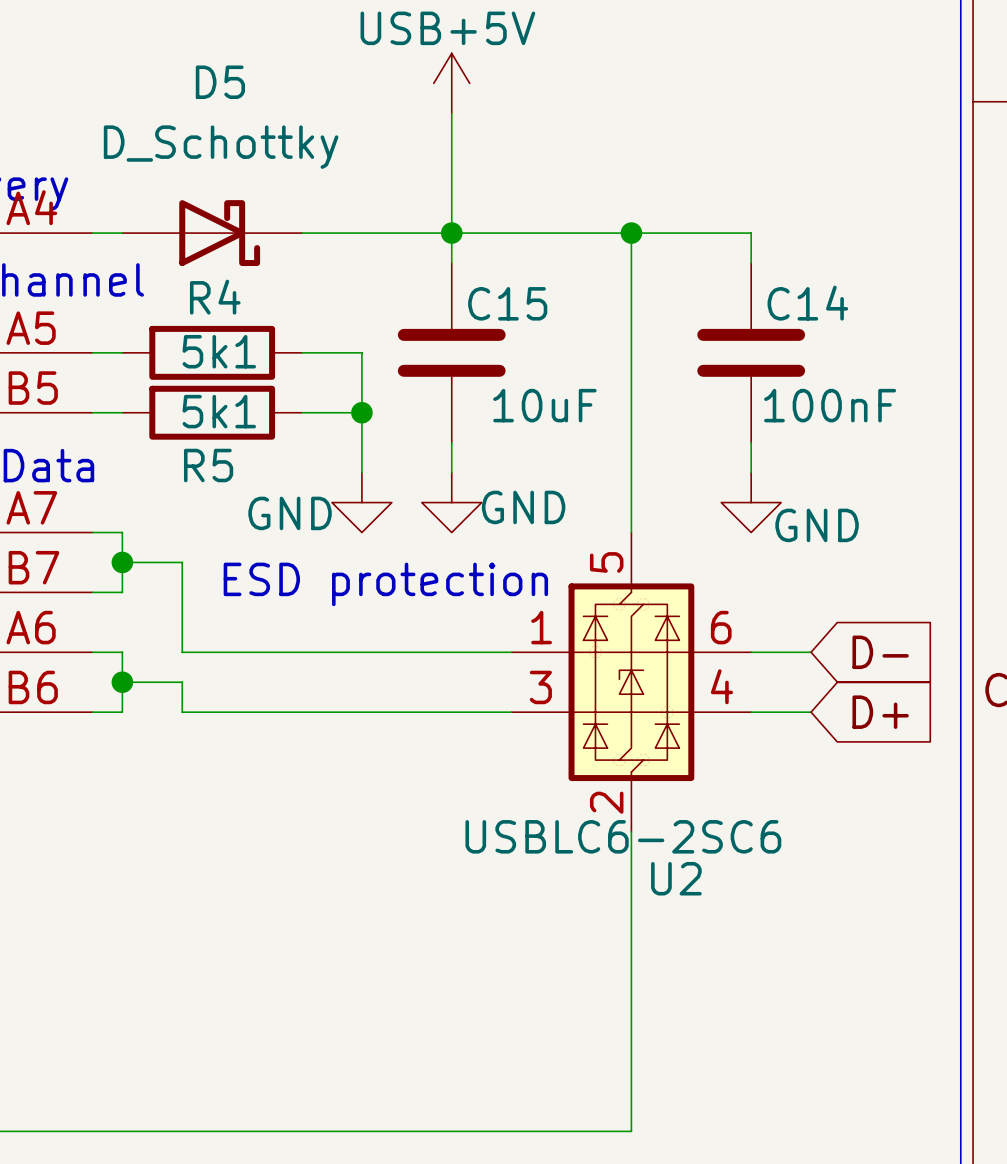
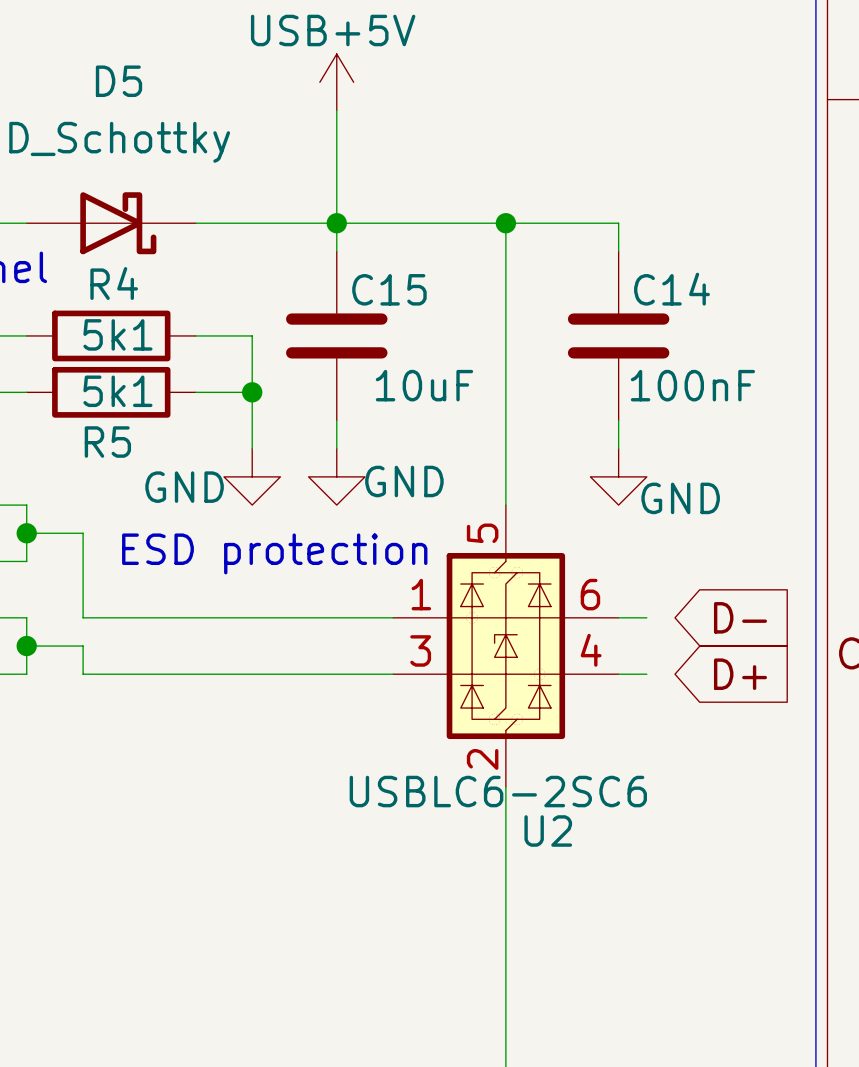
wire: (781, 652) (811, 652) -> none
wire: (781, 712) (811, 712) -> none

